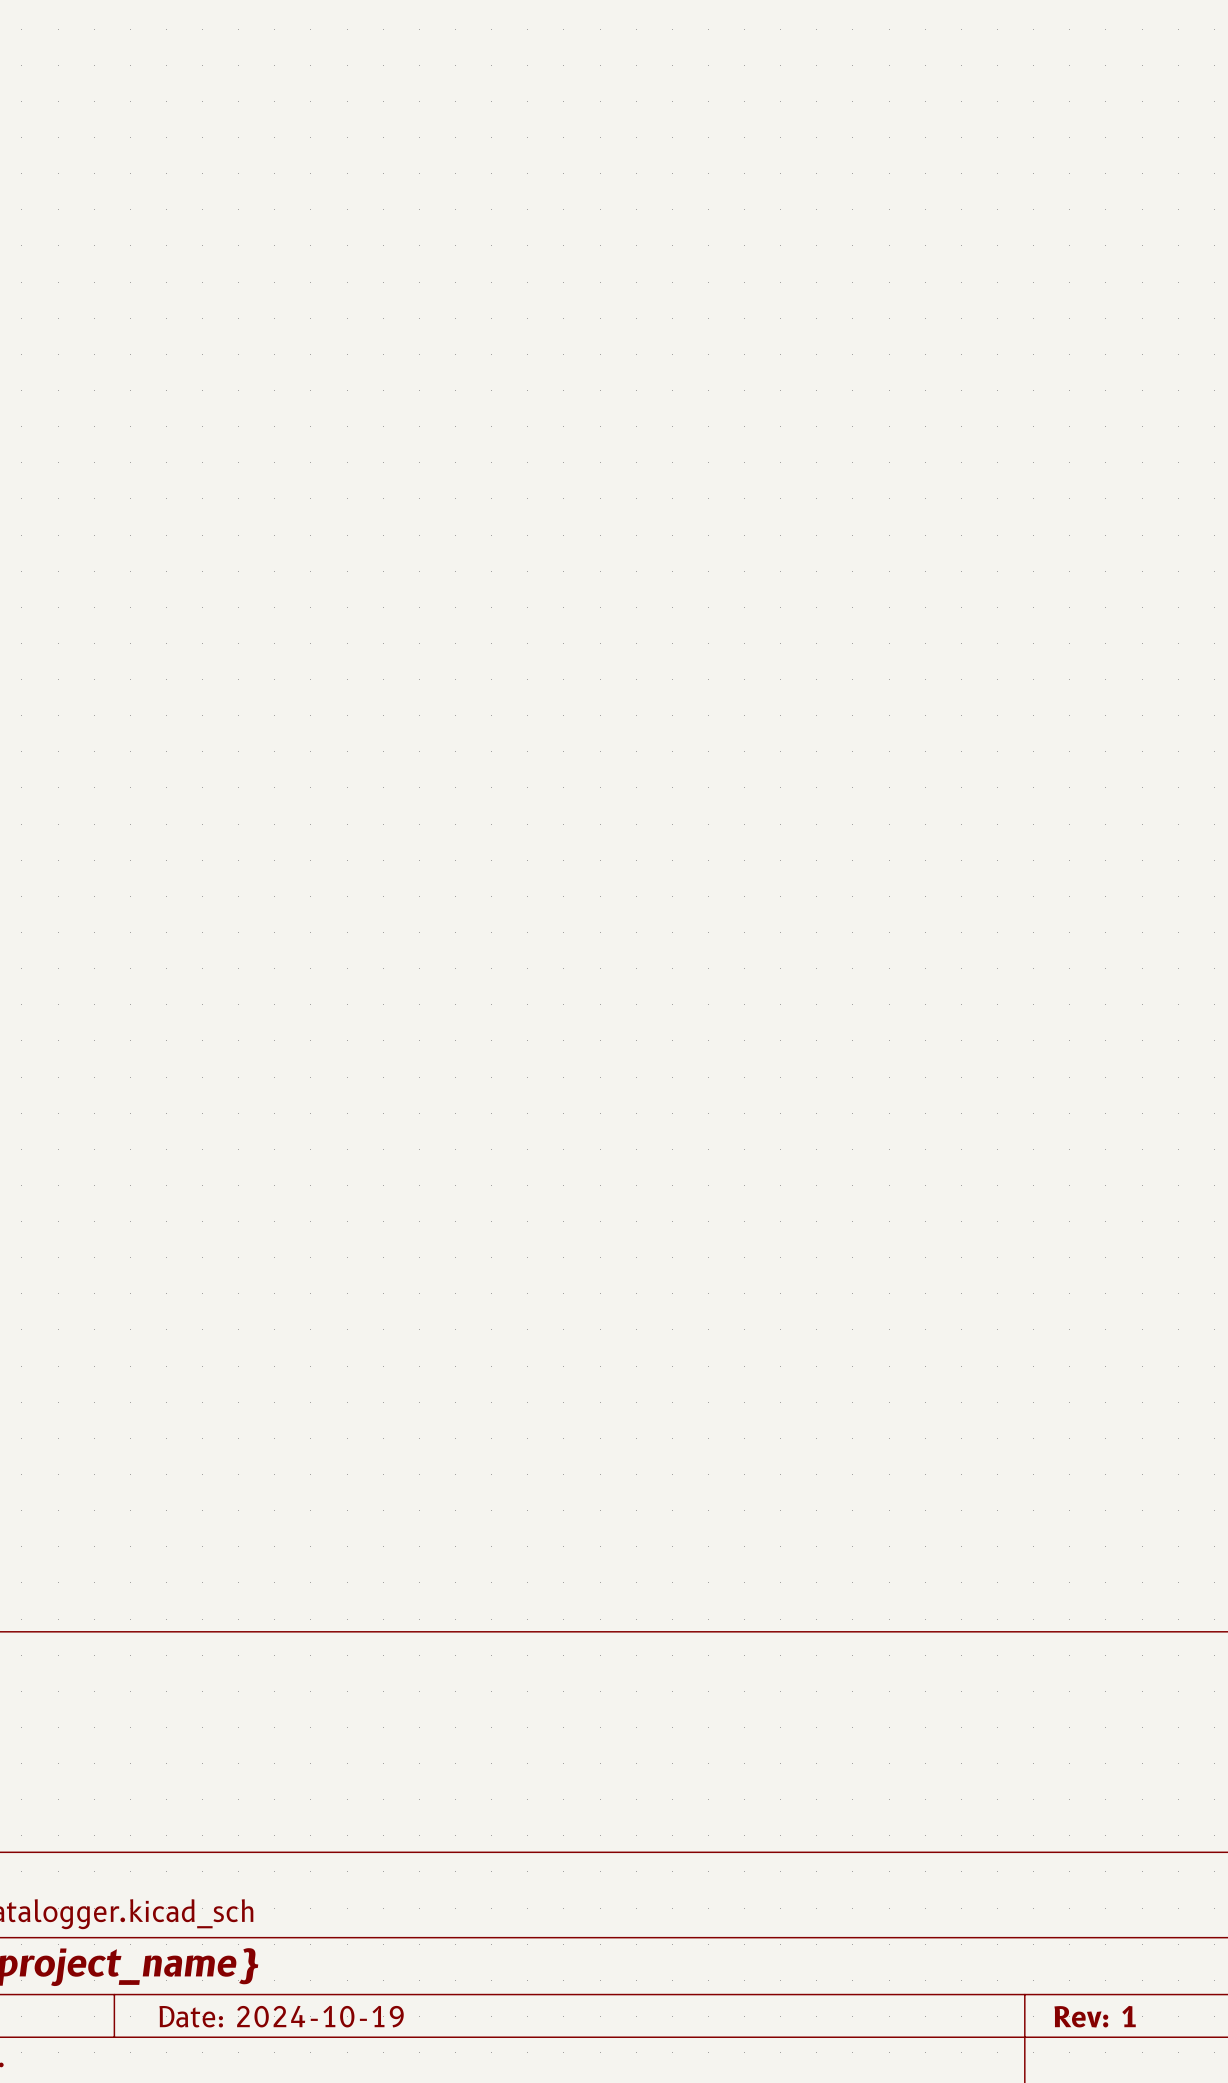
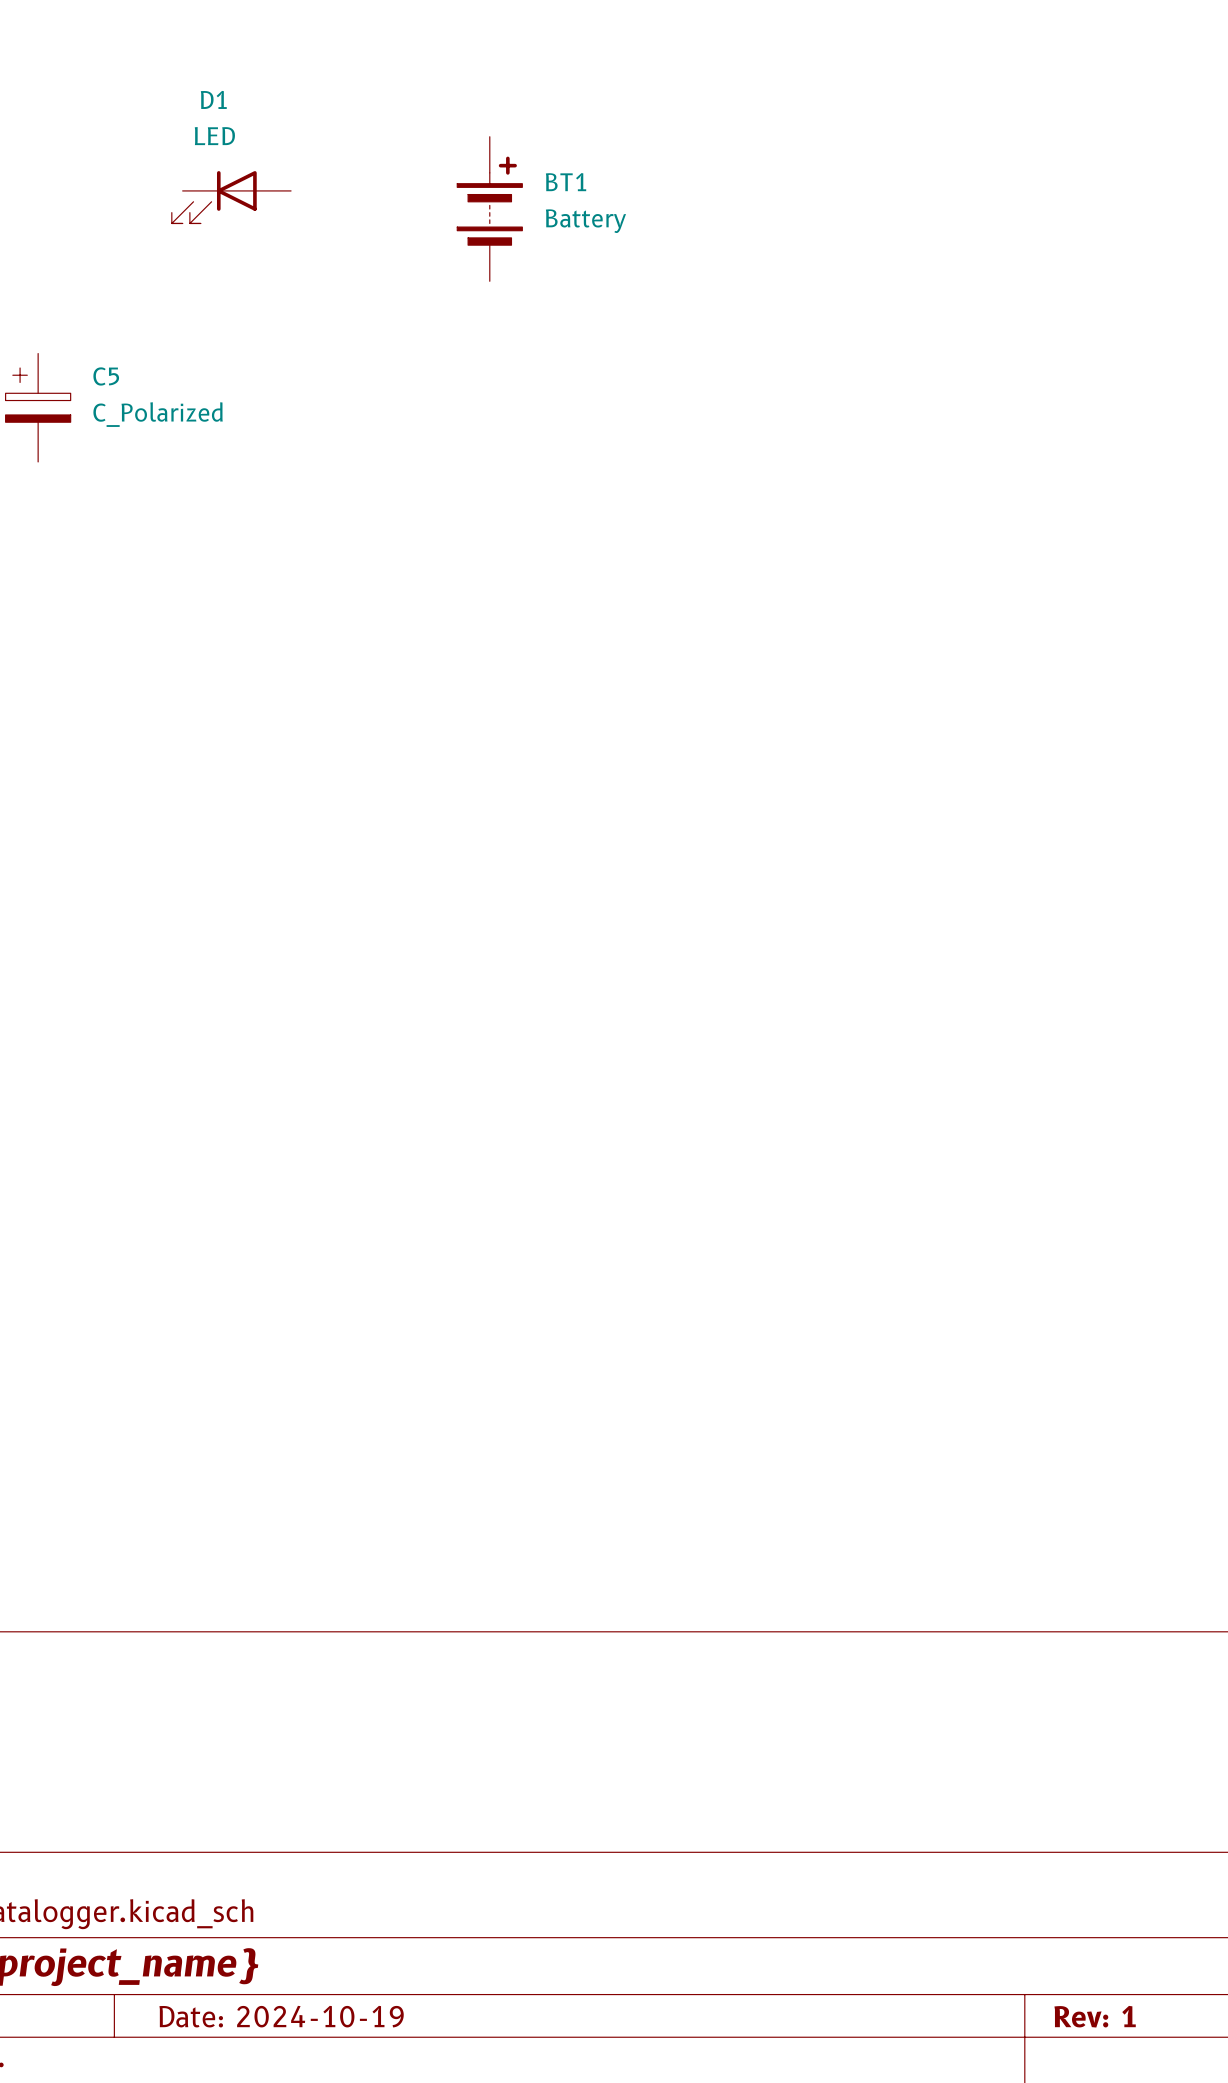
D1: none -> LED (231, 197)
BT1: none -> Battery (489, 209)
C5: none -> C_Polarized (38, 407)

